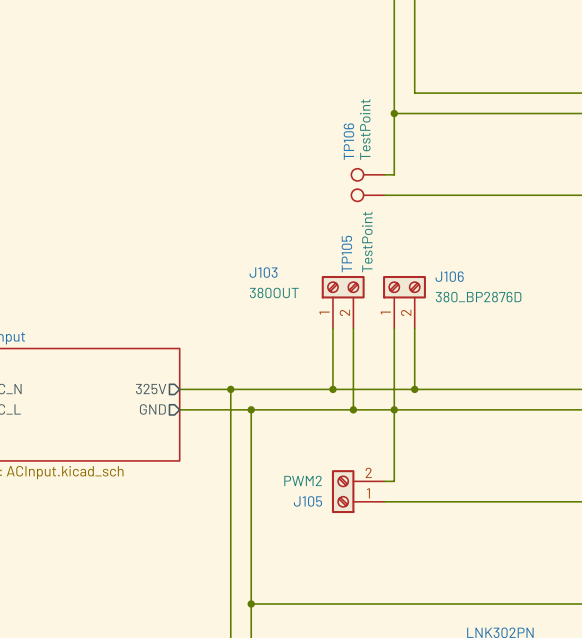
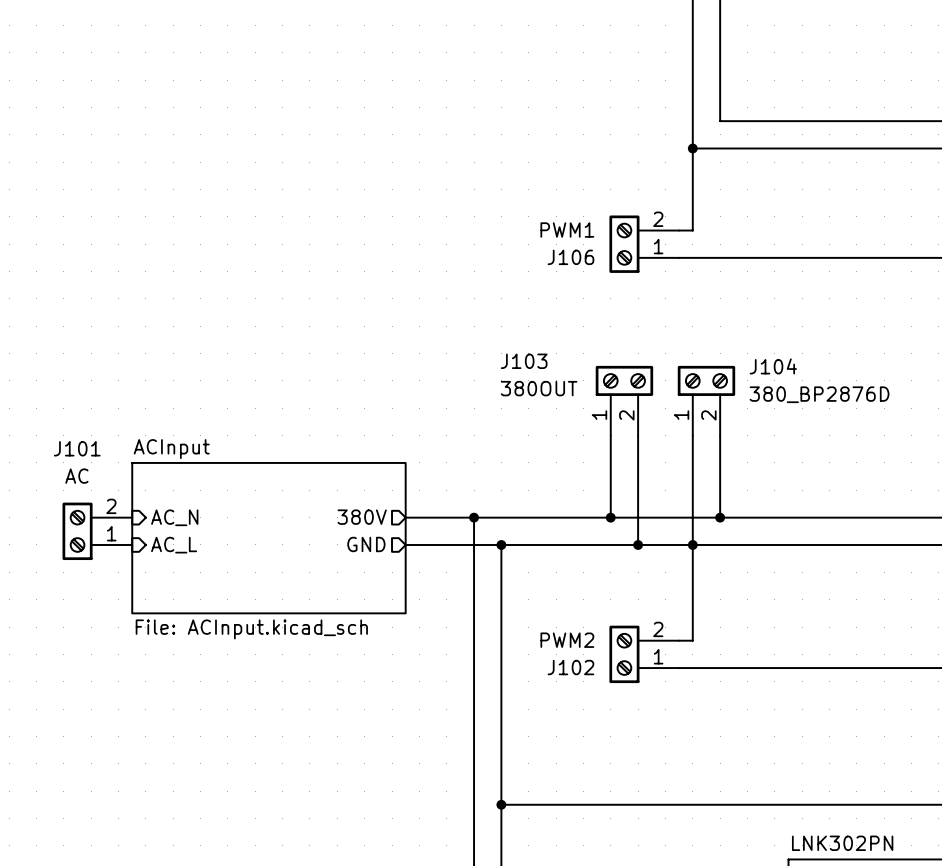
TP106: TestPoint (367, 174) -> none
J106: none -> PWM1 (644, 244)
TP105: TestPoint (367, 195) -> none
J106 name: J106 (449, 276) -> J104 (773, 366)
sheet pin: 325V (151, 389) -> 380V (362, 517)
J105 name: J105 (307, 501) -> J102 (570, 667)

